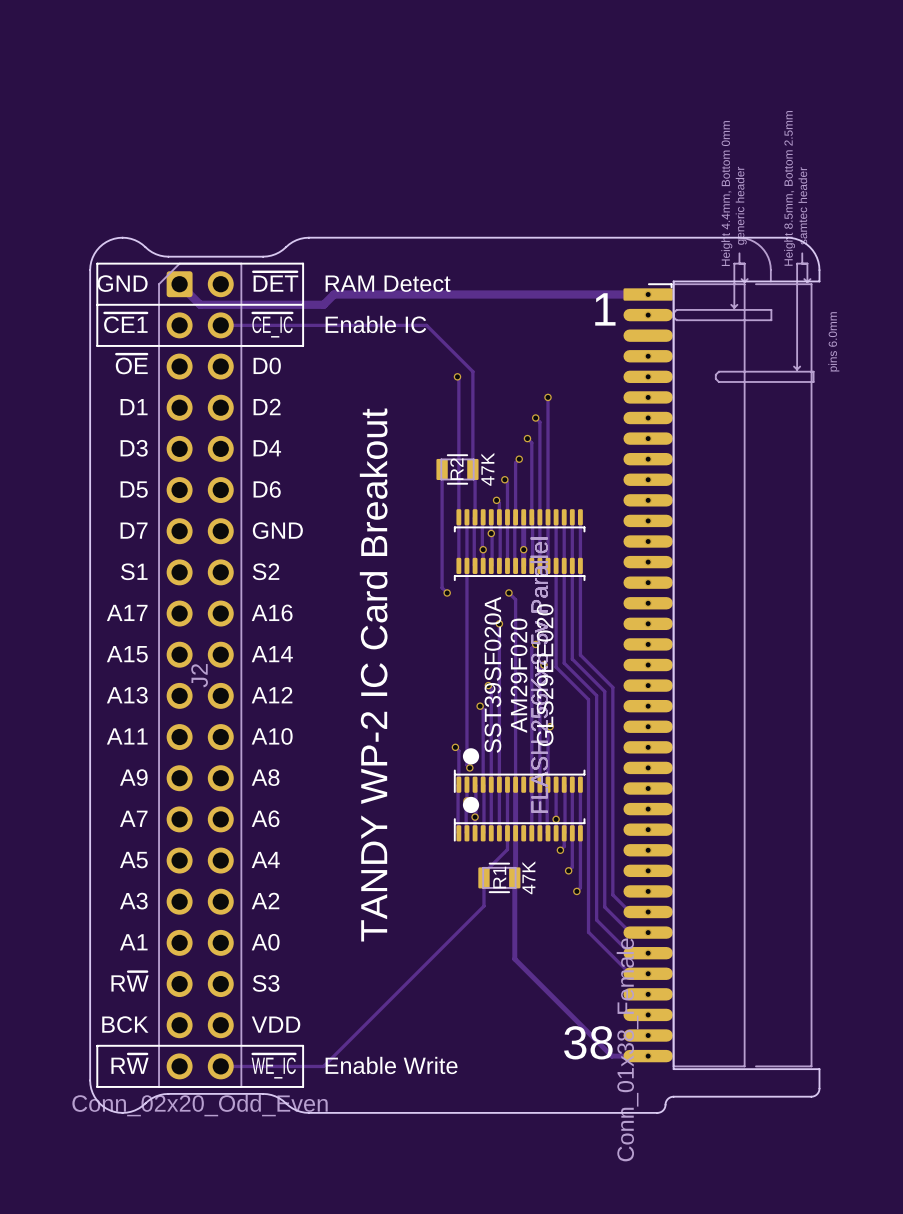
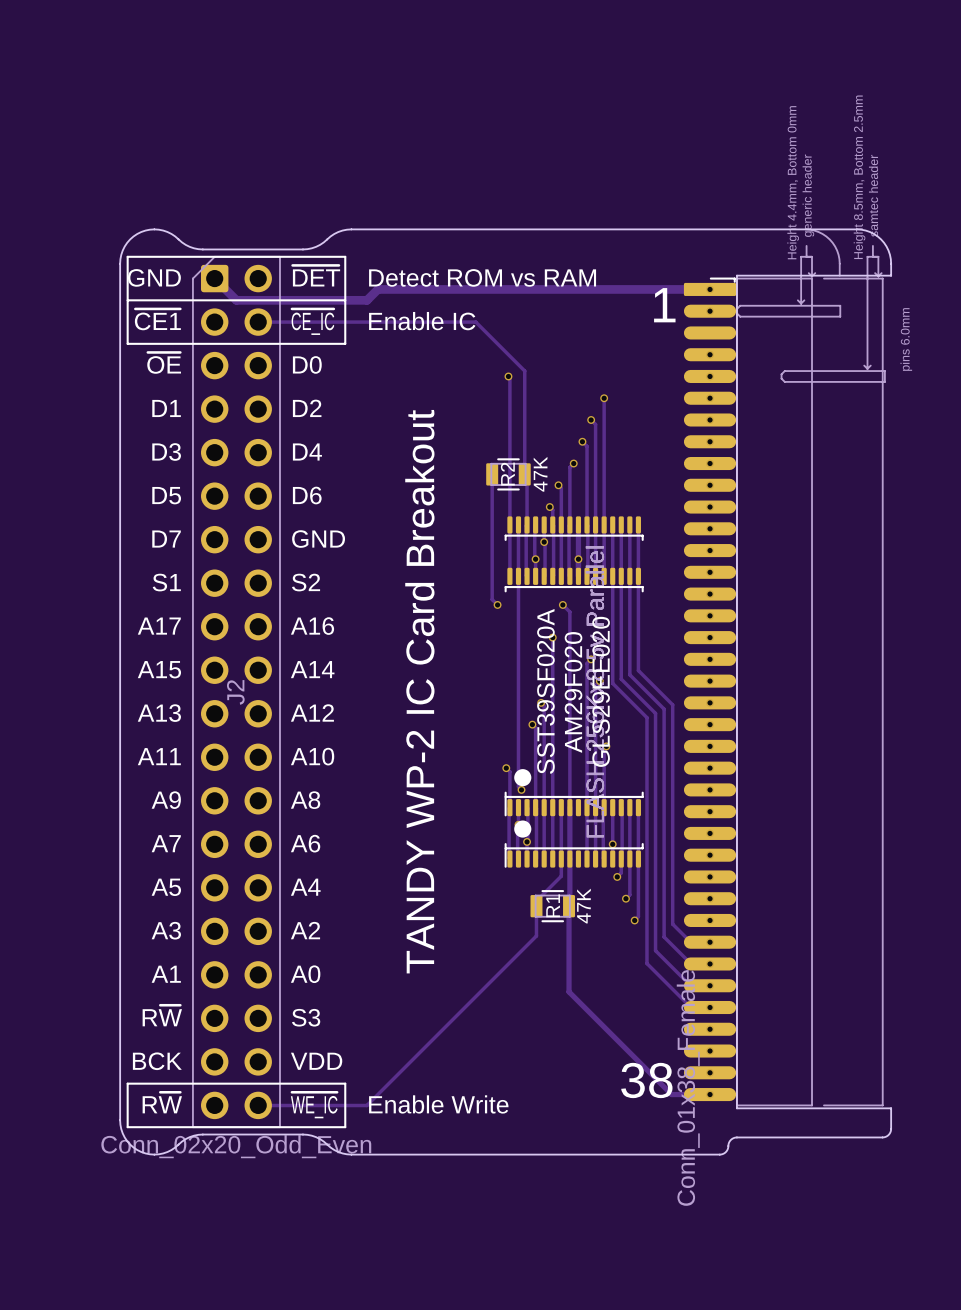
text: RAM Detect (388, 283) -> Detect ROM vs RAM (482, 277)

